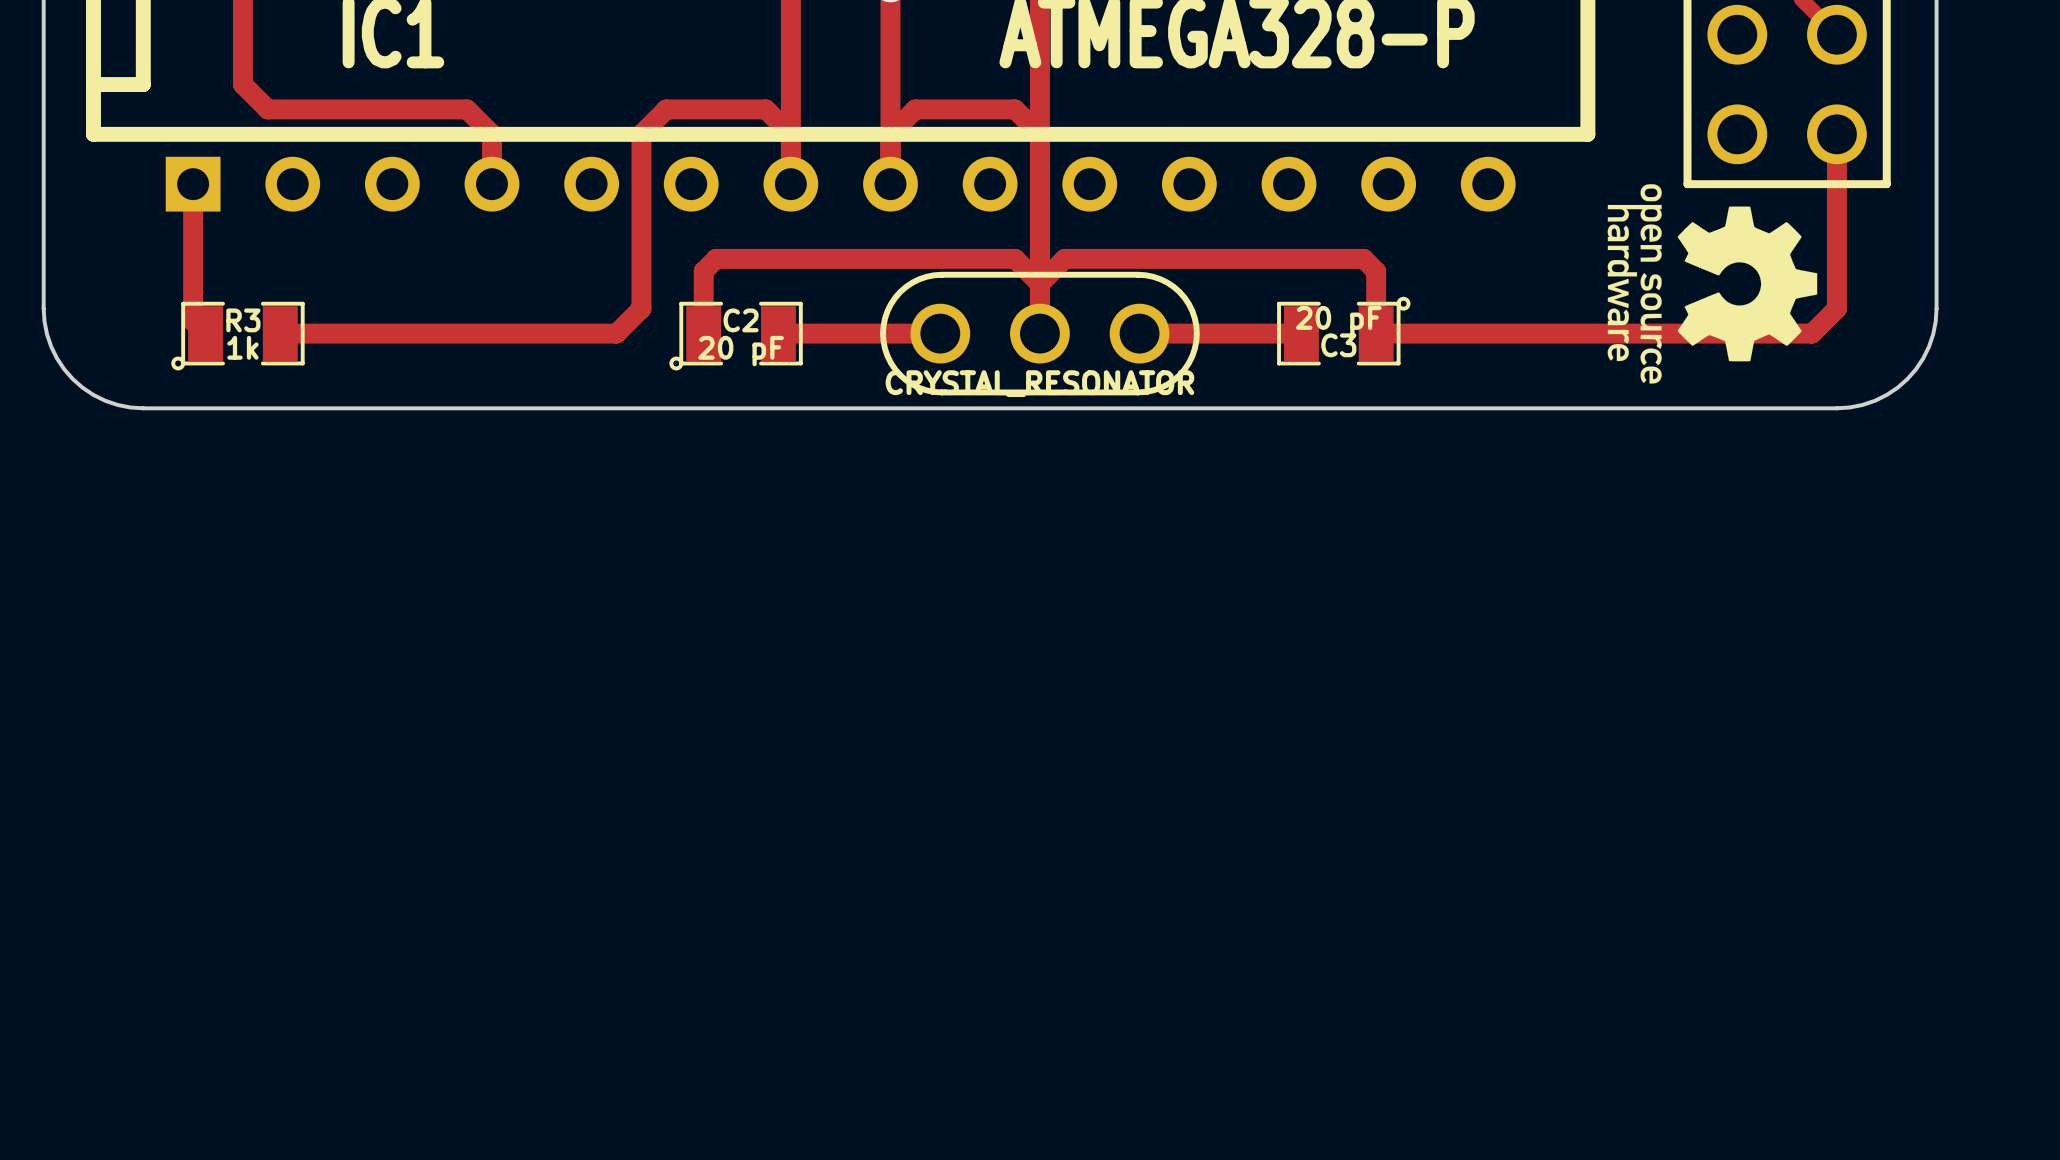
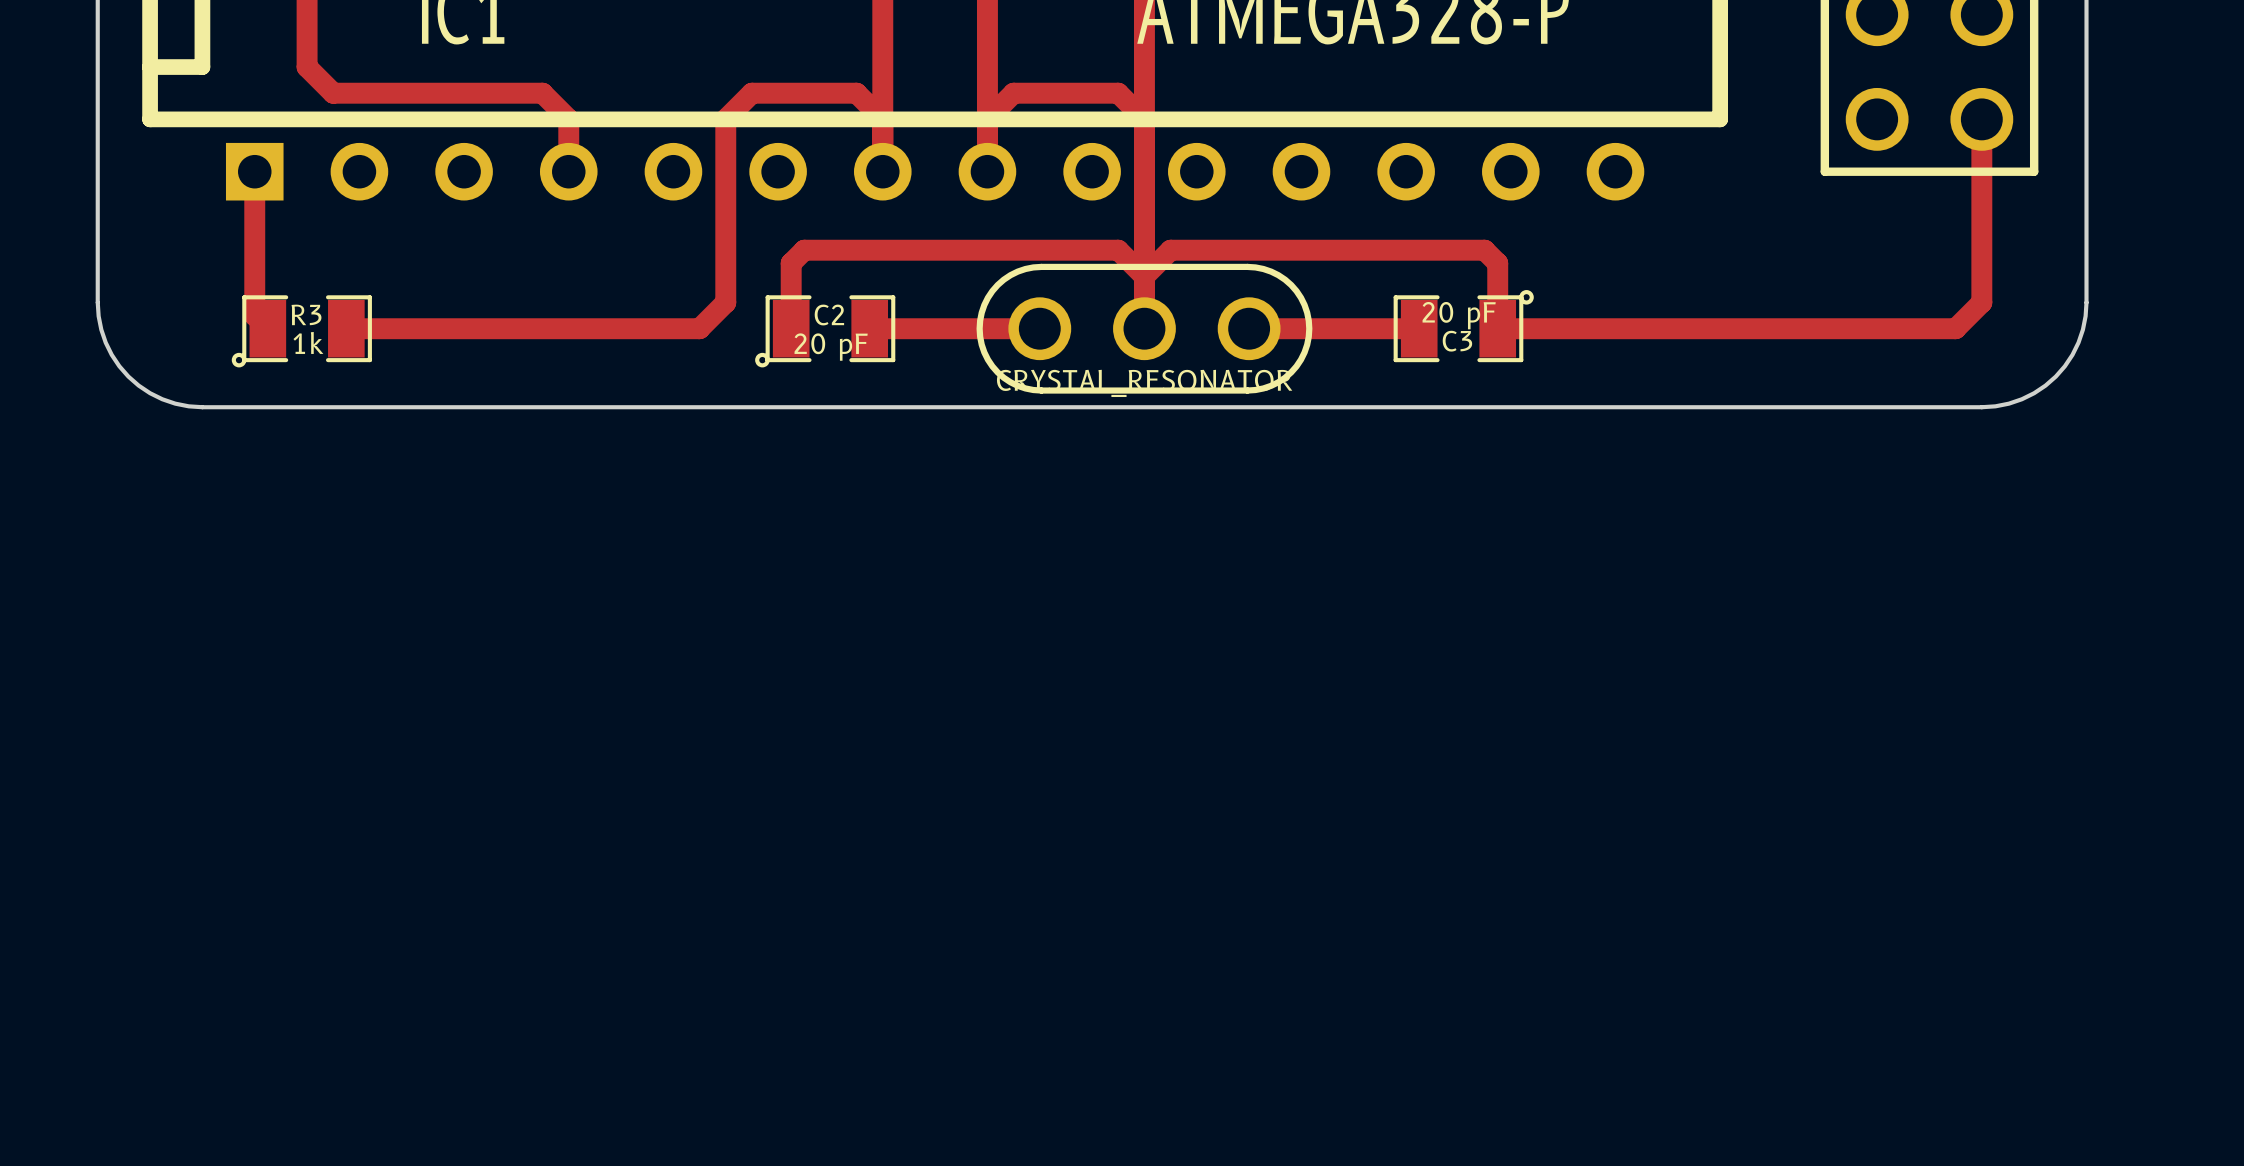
drawing: [1607, 184, 1818, 384] -> none

